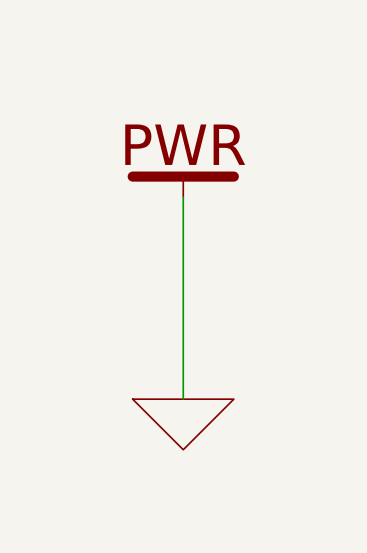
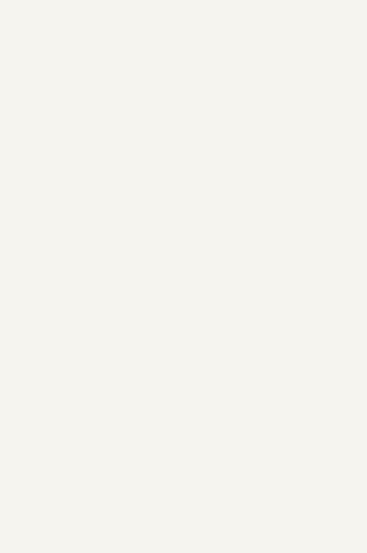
power symbol: (183, 184) -> none
wire: (183, 196) (183, 399) -> none
power symbol: (183, 424) -> none

